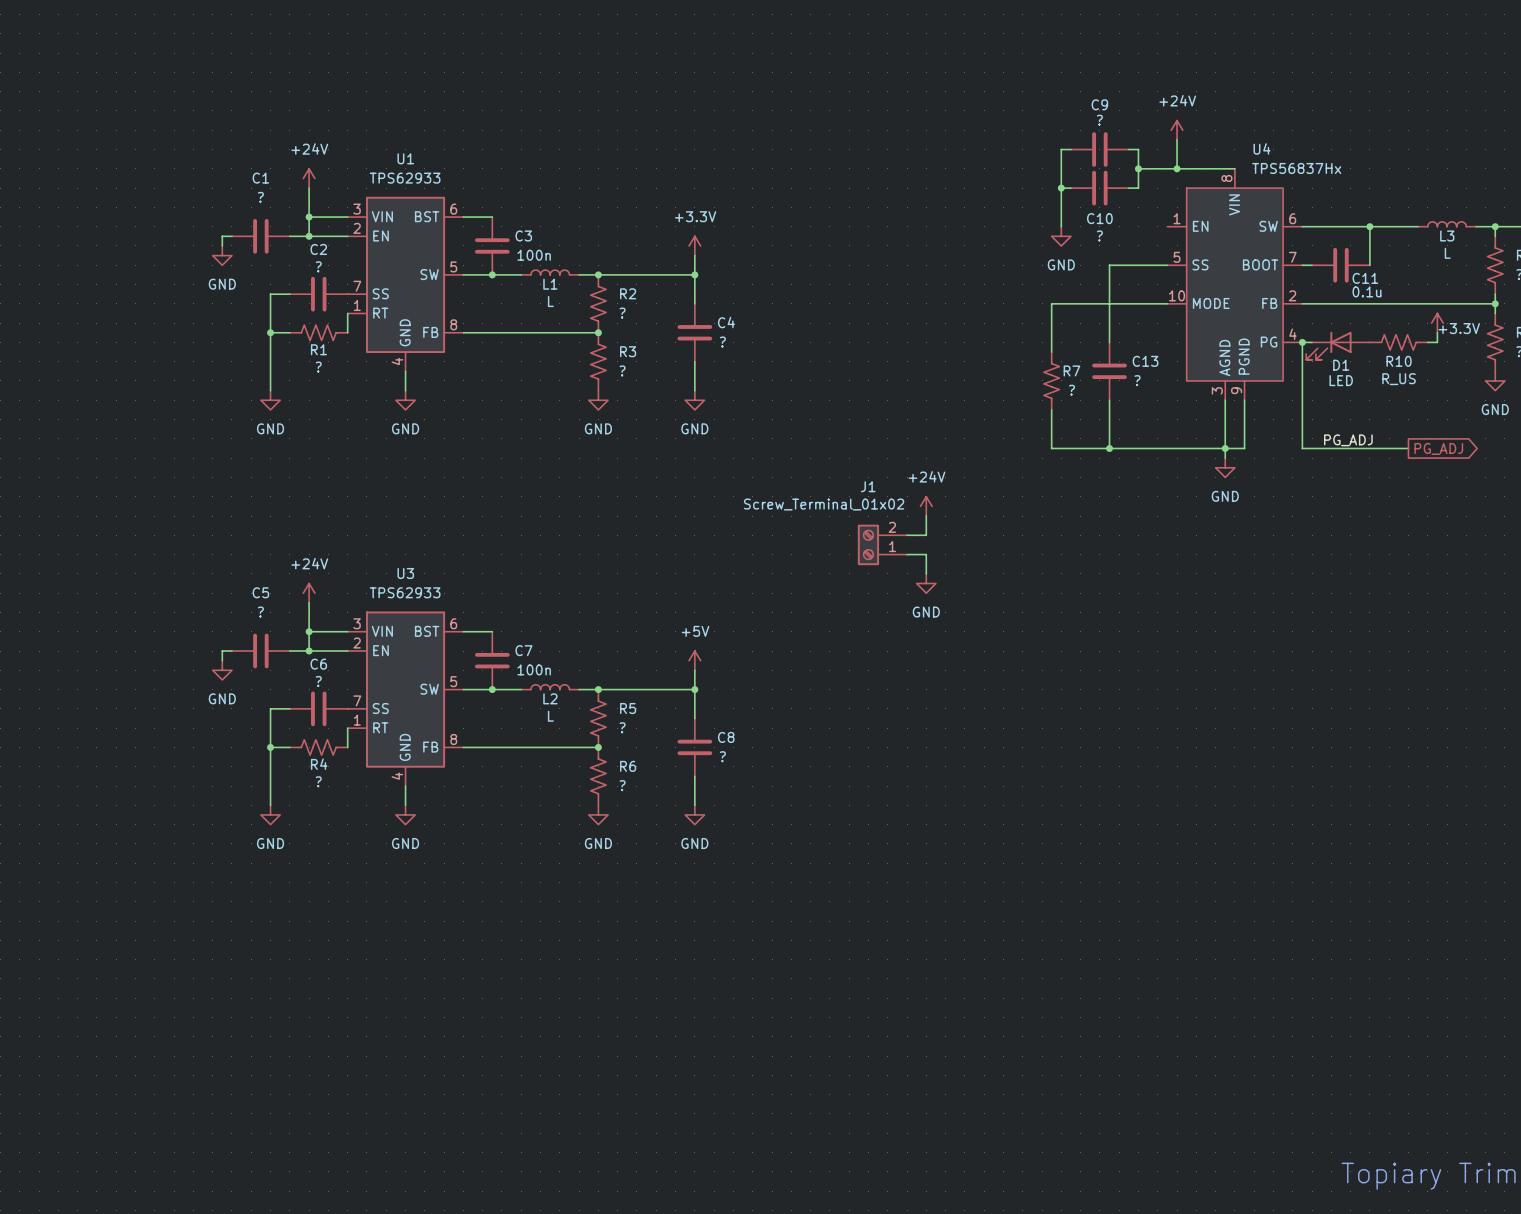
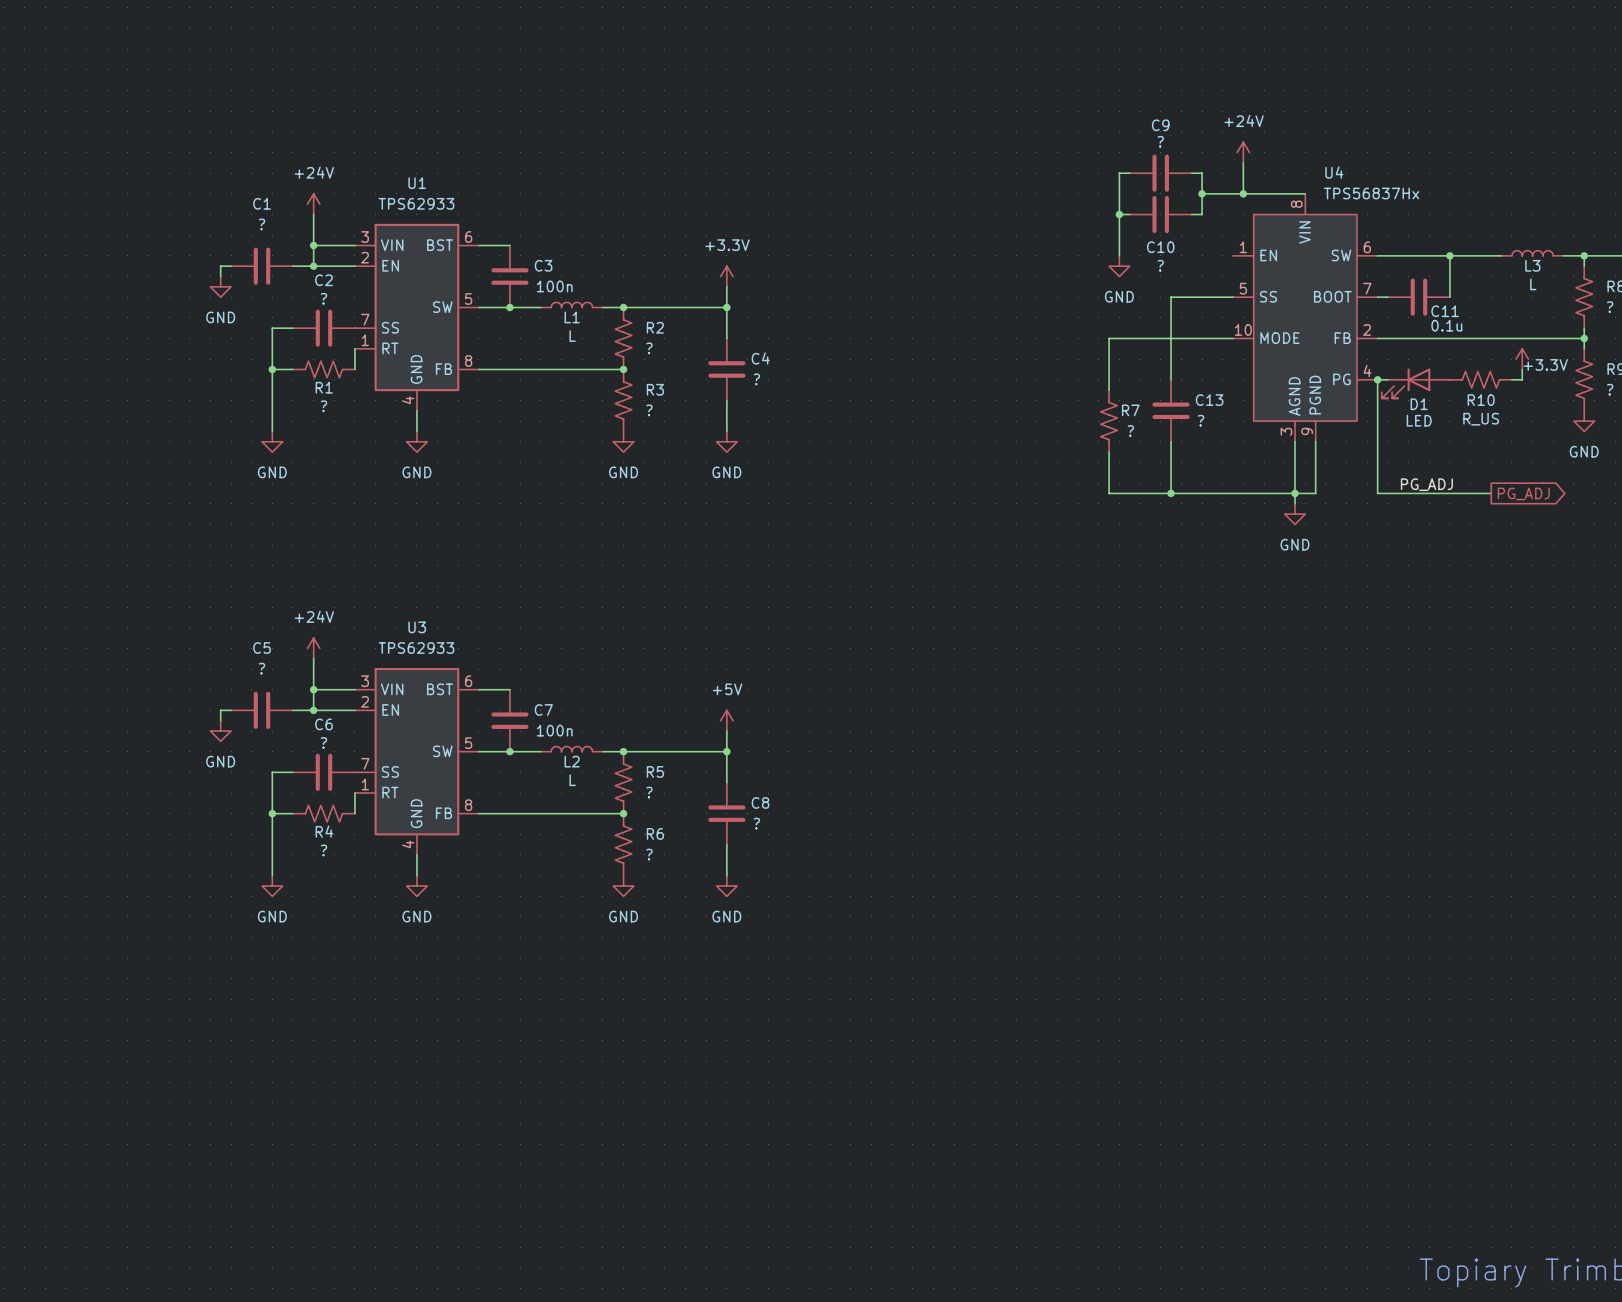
power symbol: +24V (926, 506) -> none
wire: (926, 516) (926, 535) (907, 535) -> none
J1: Screw_Terminal_01x02 (882, 544) -> none
wire: (907, 554) (926, 554) (926, 573) -> none
power symbol: GND (926, 583) -> none

